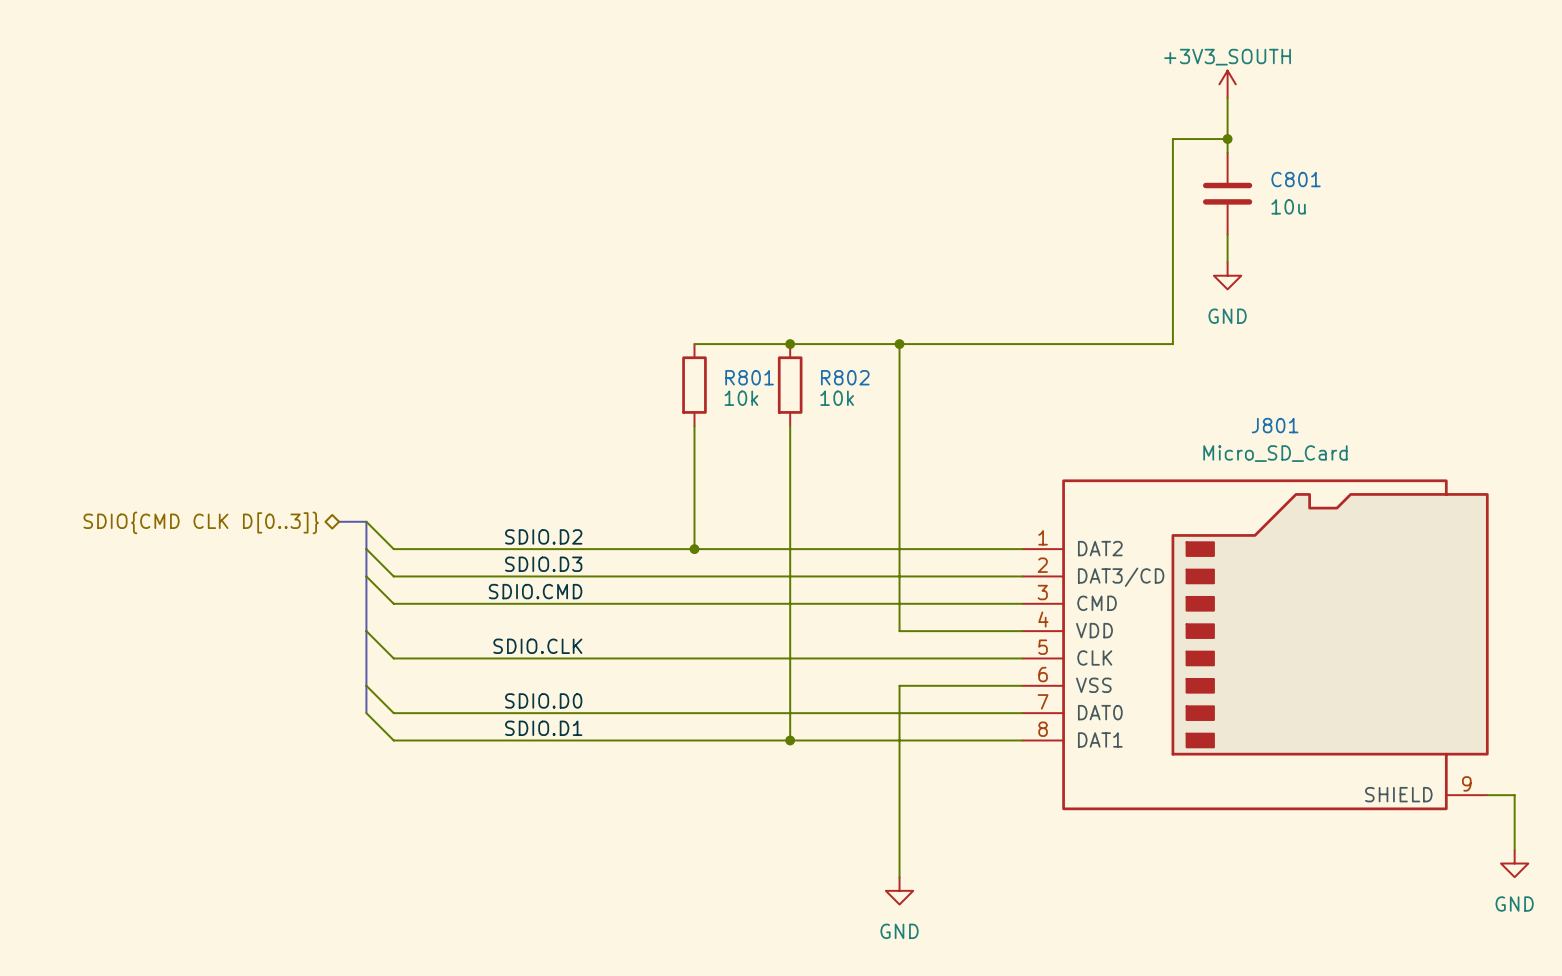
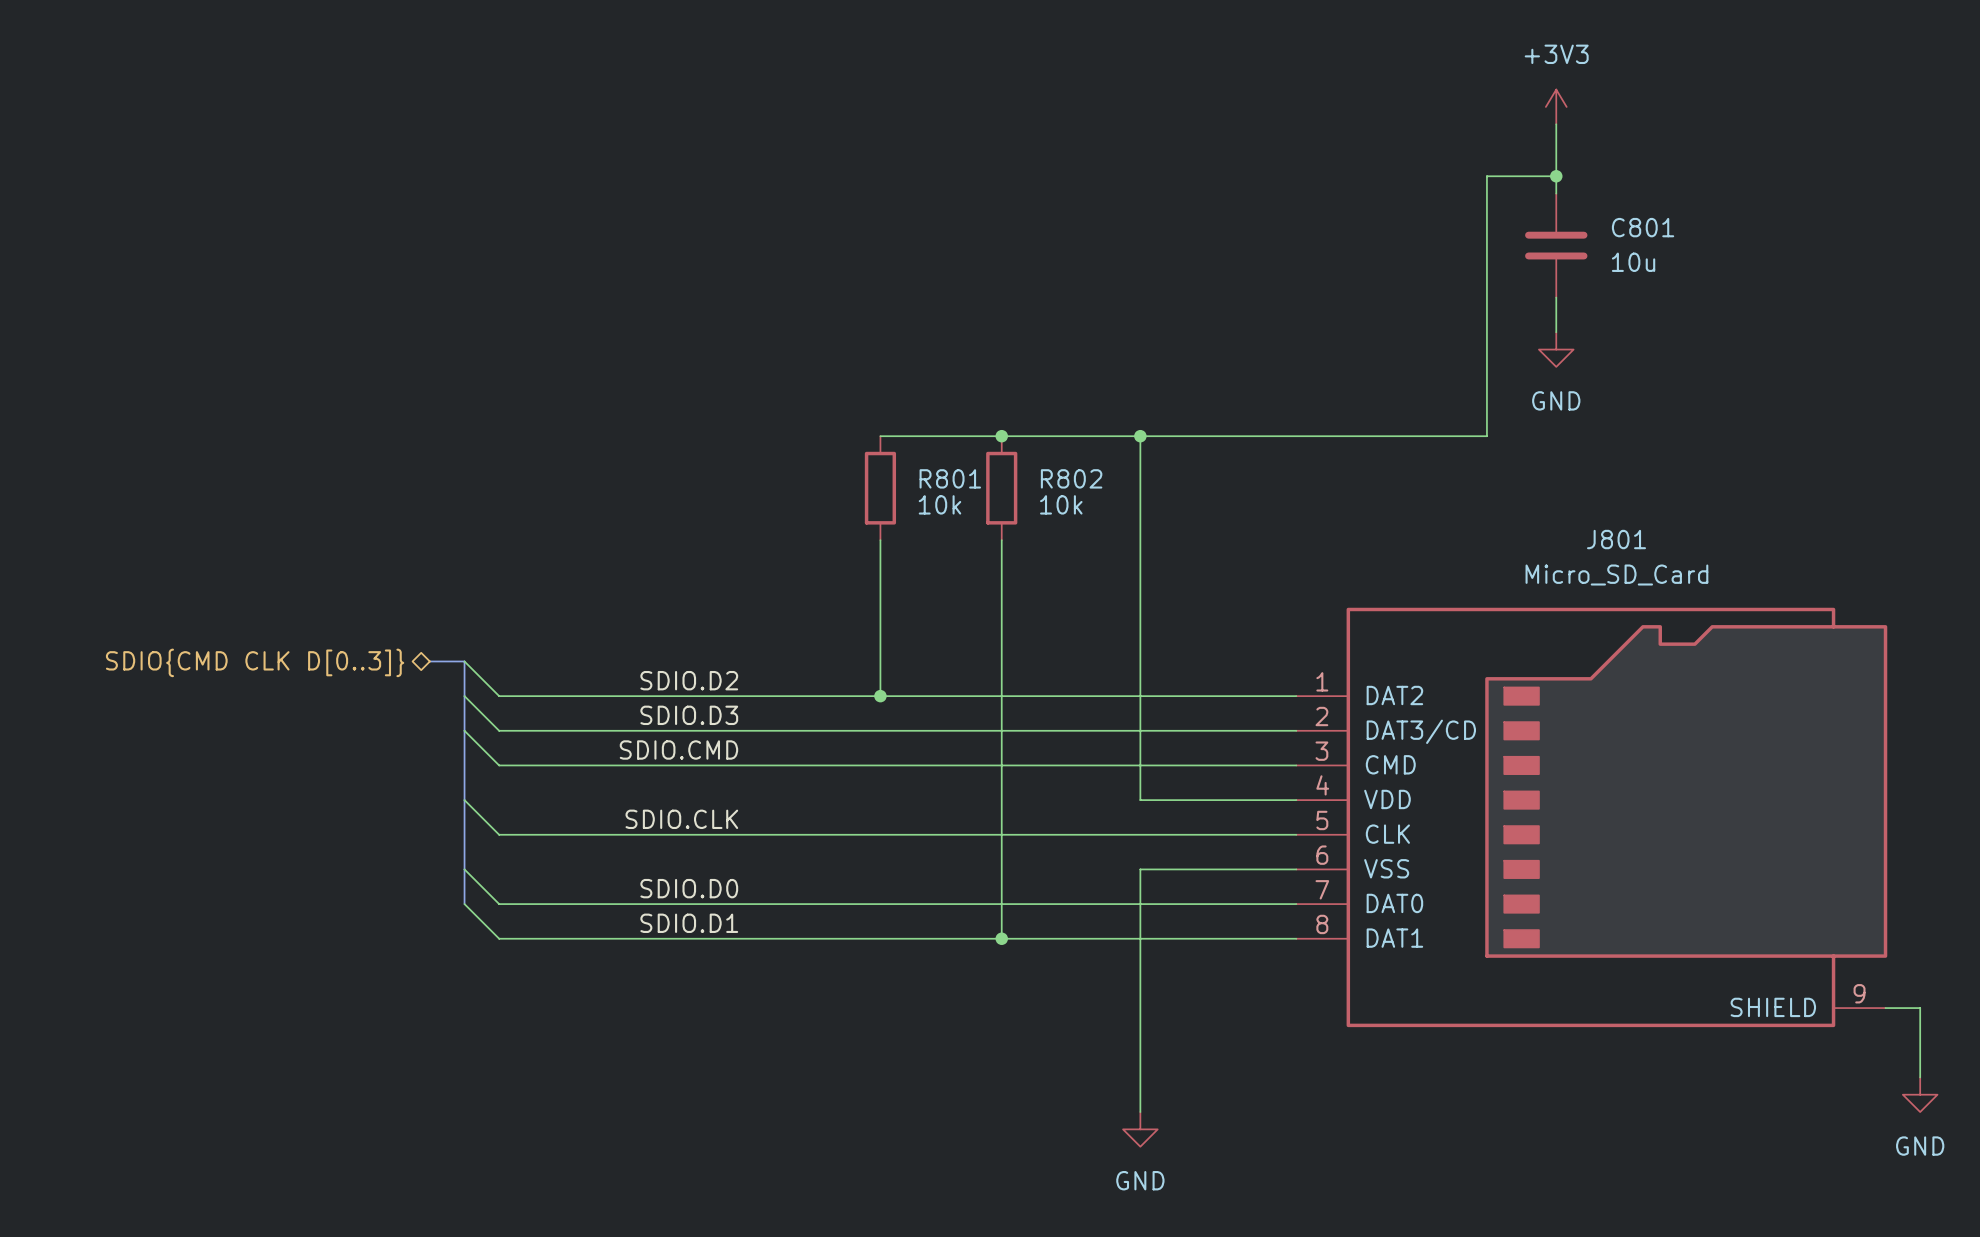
power symbol: +3V3_SOUTH (1227, 84) -> +3V3 (1556, 106)

